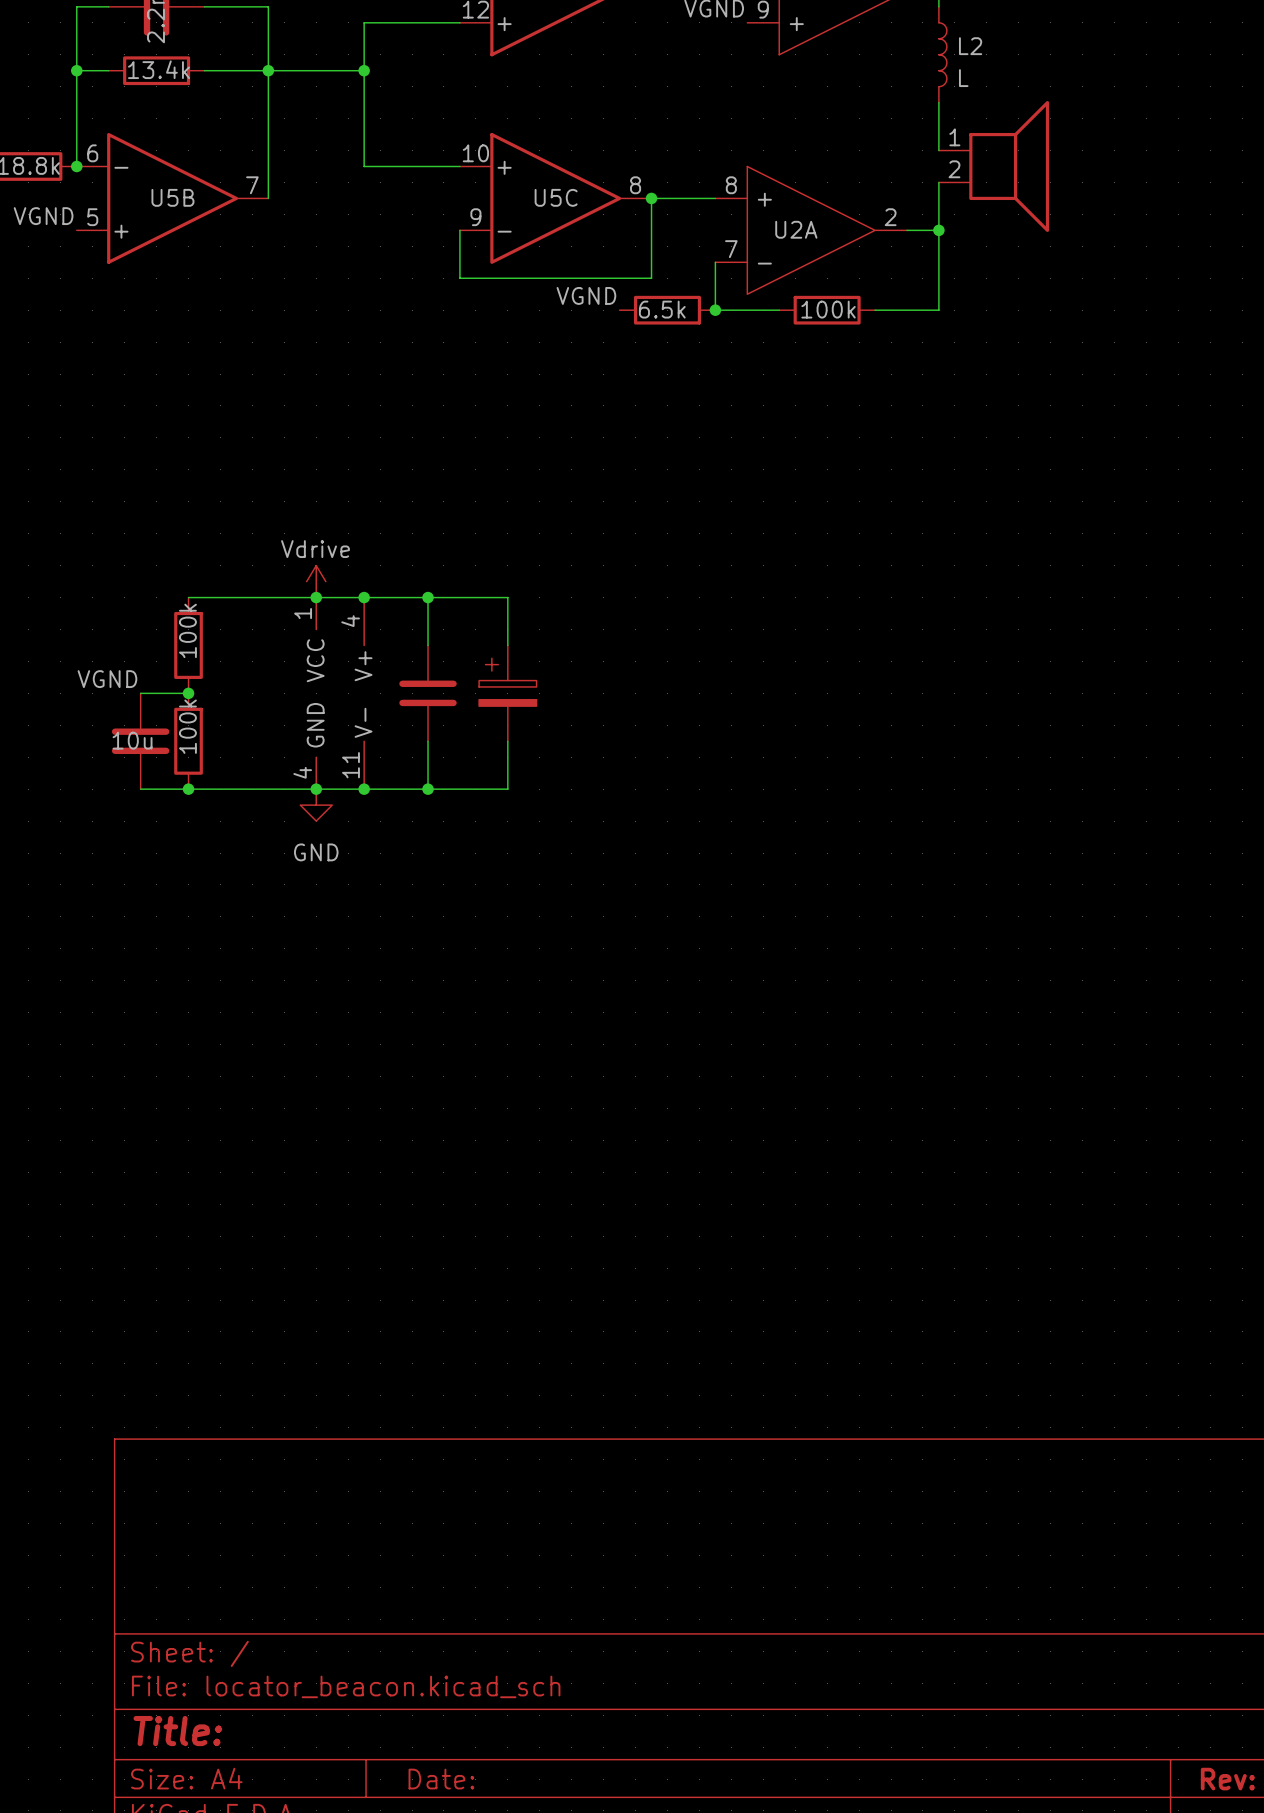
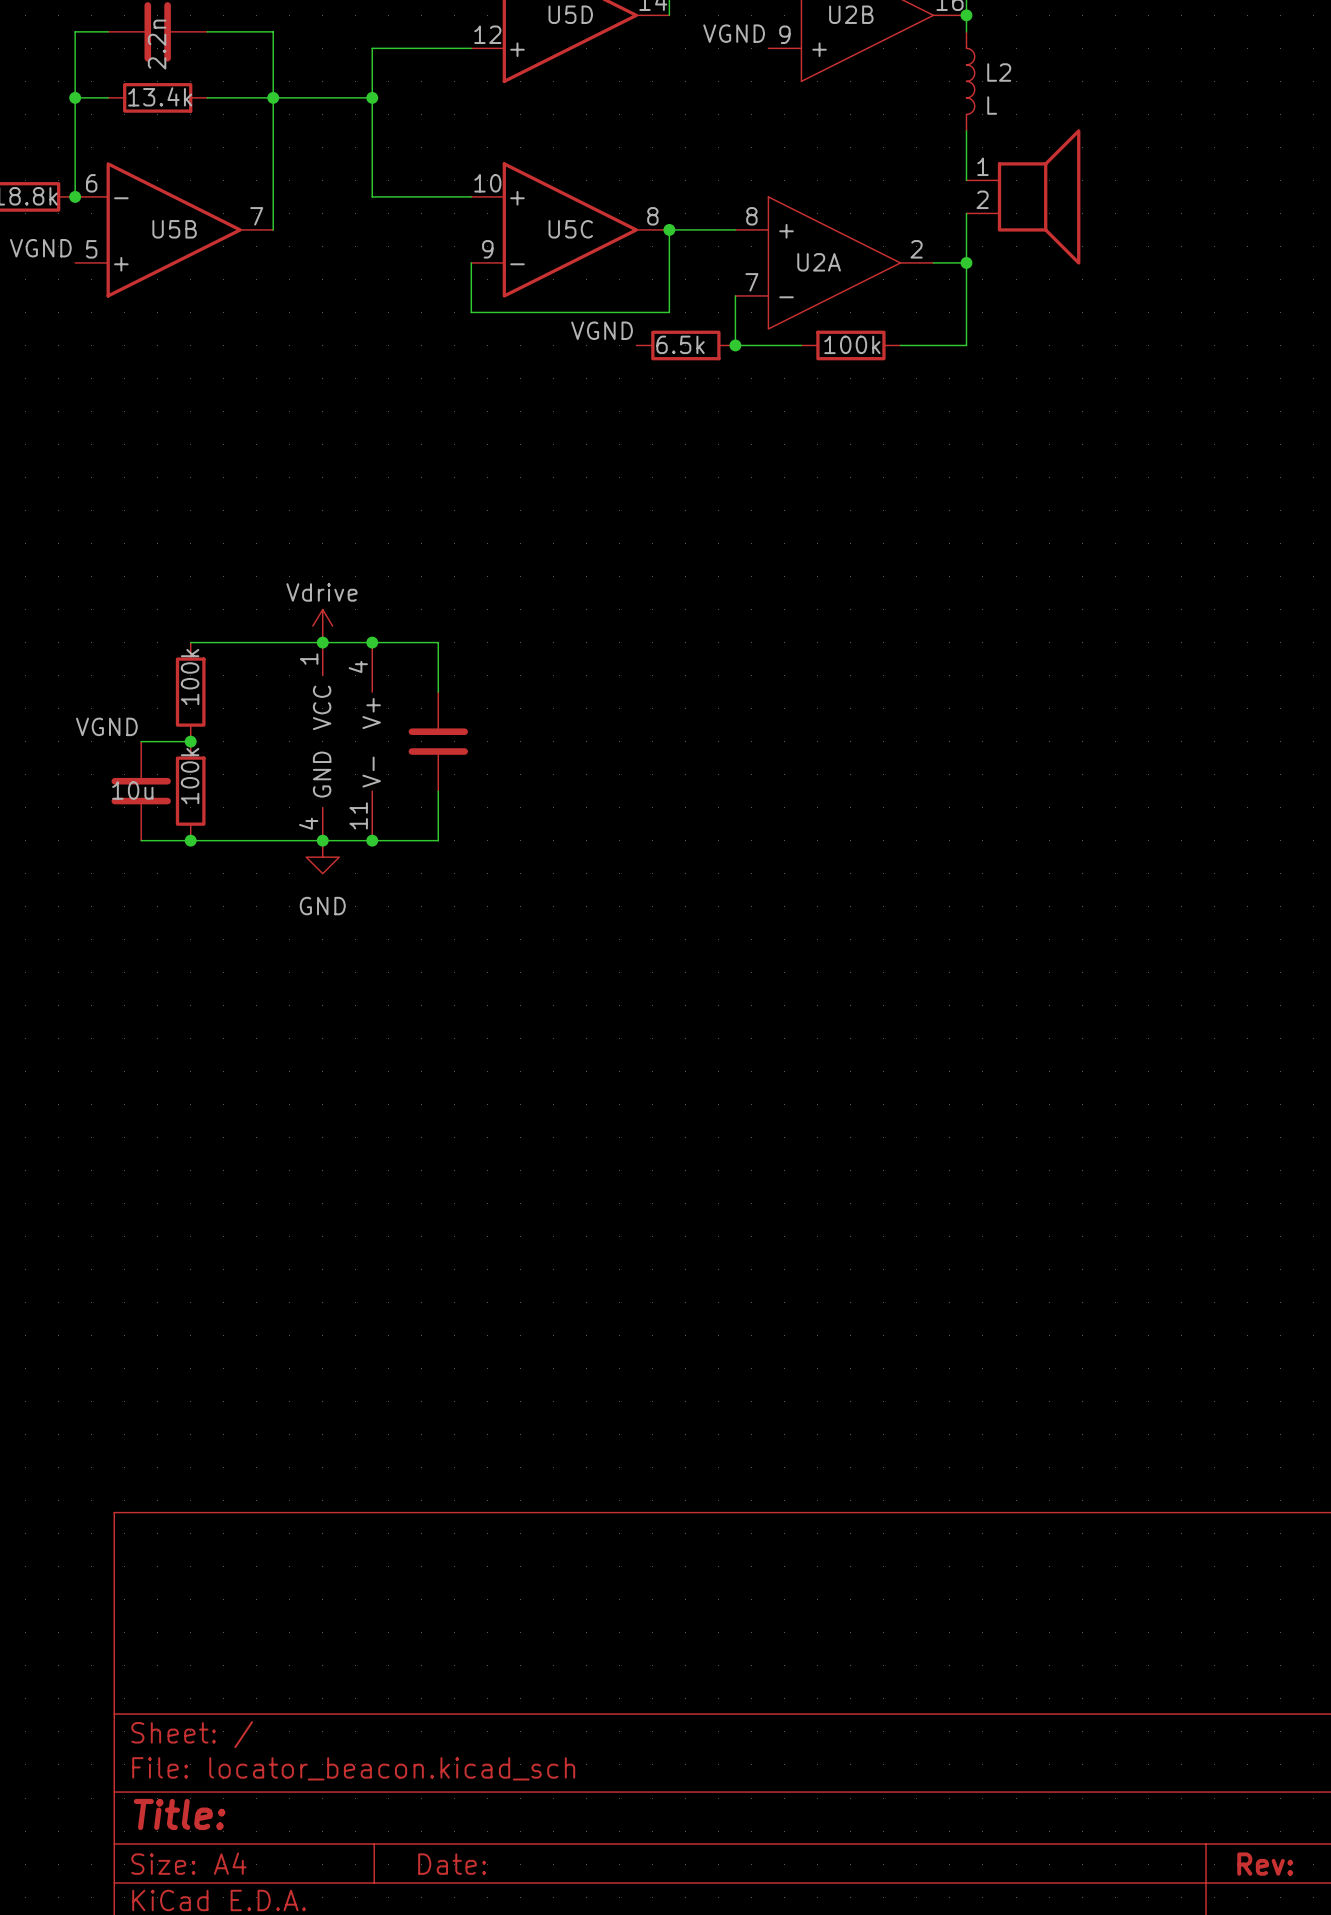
wire: (428, 597) (507, 597) (507, 645) -> none
junction: (428, 597) -> none
part: (507, 693) -> none
wire: (507, 741) (507, 789) (428, 789) -> none
junction: (428, 789) -> none

